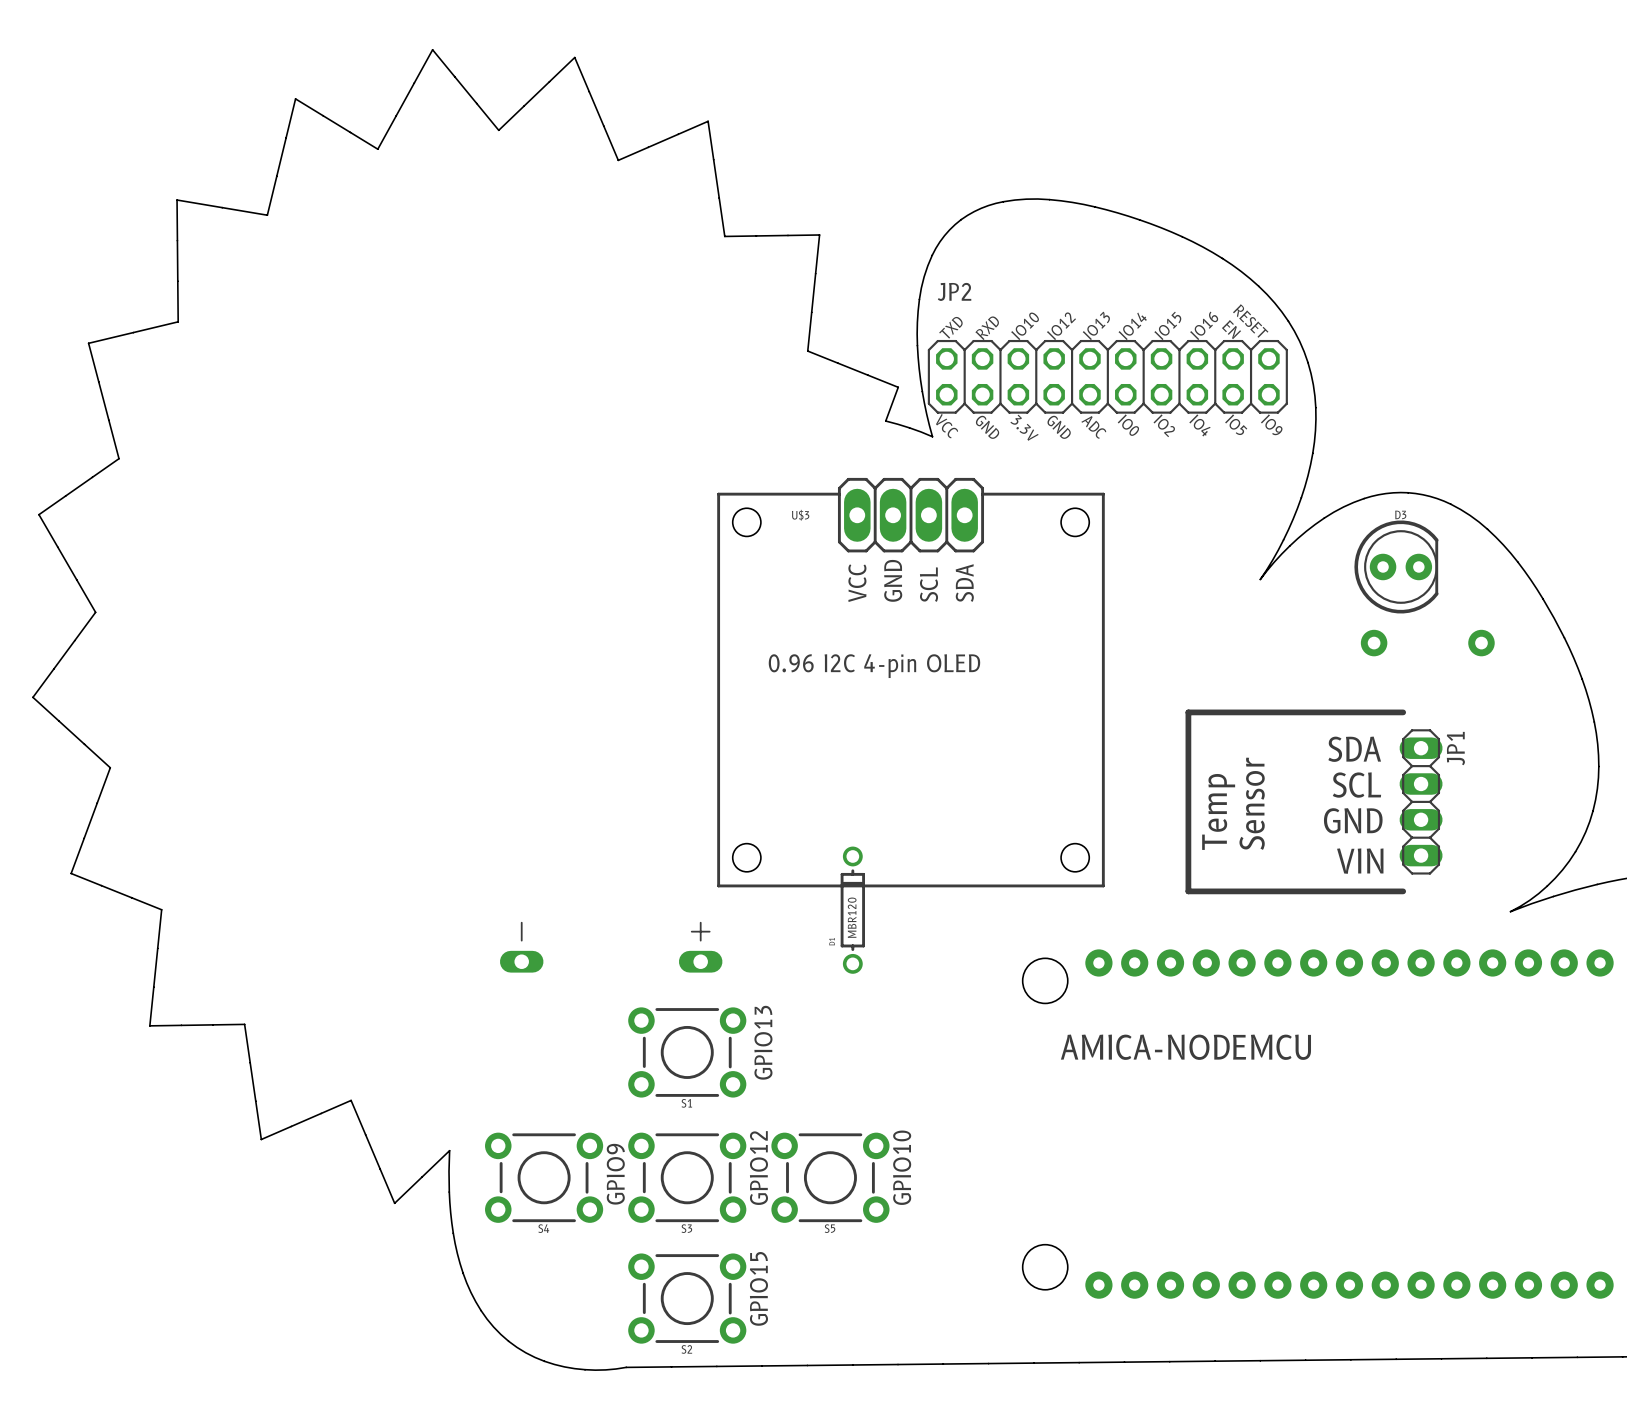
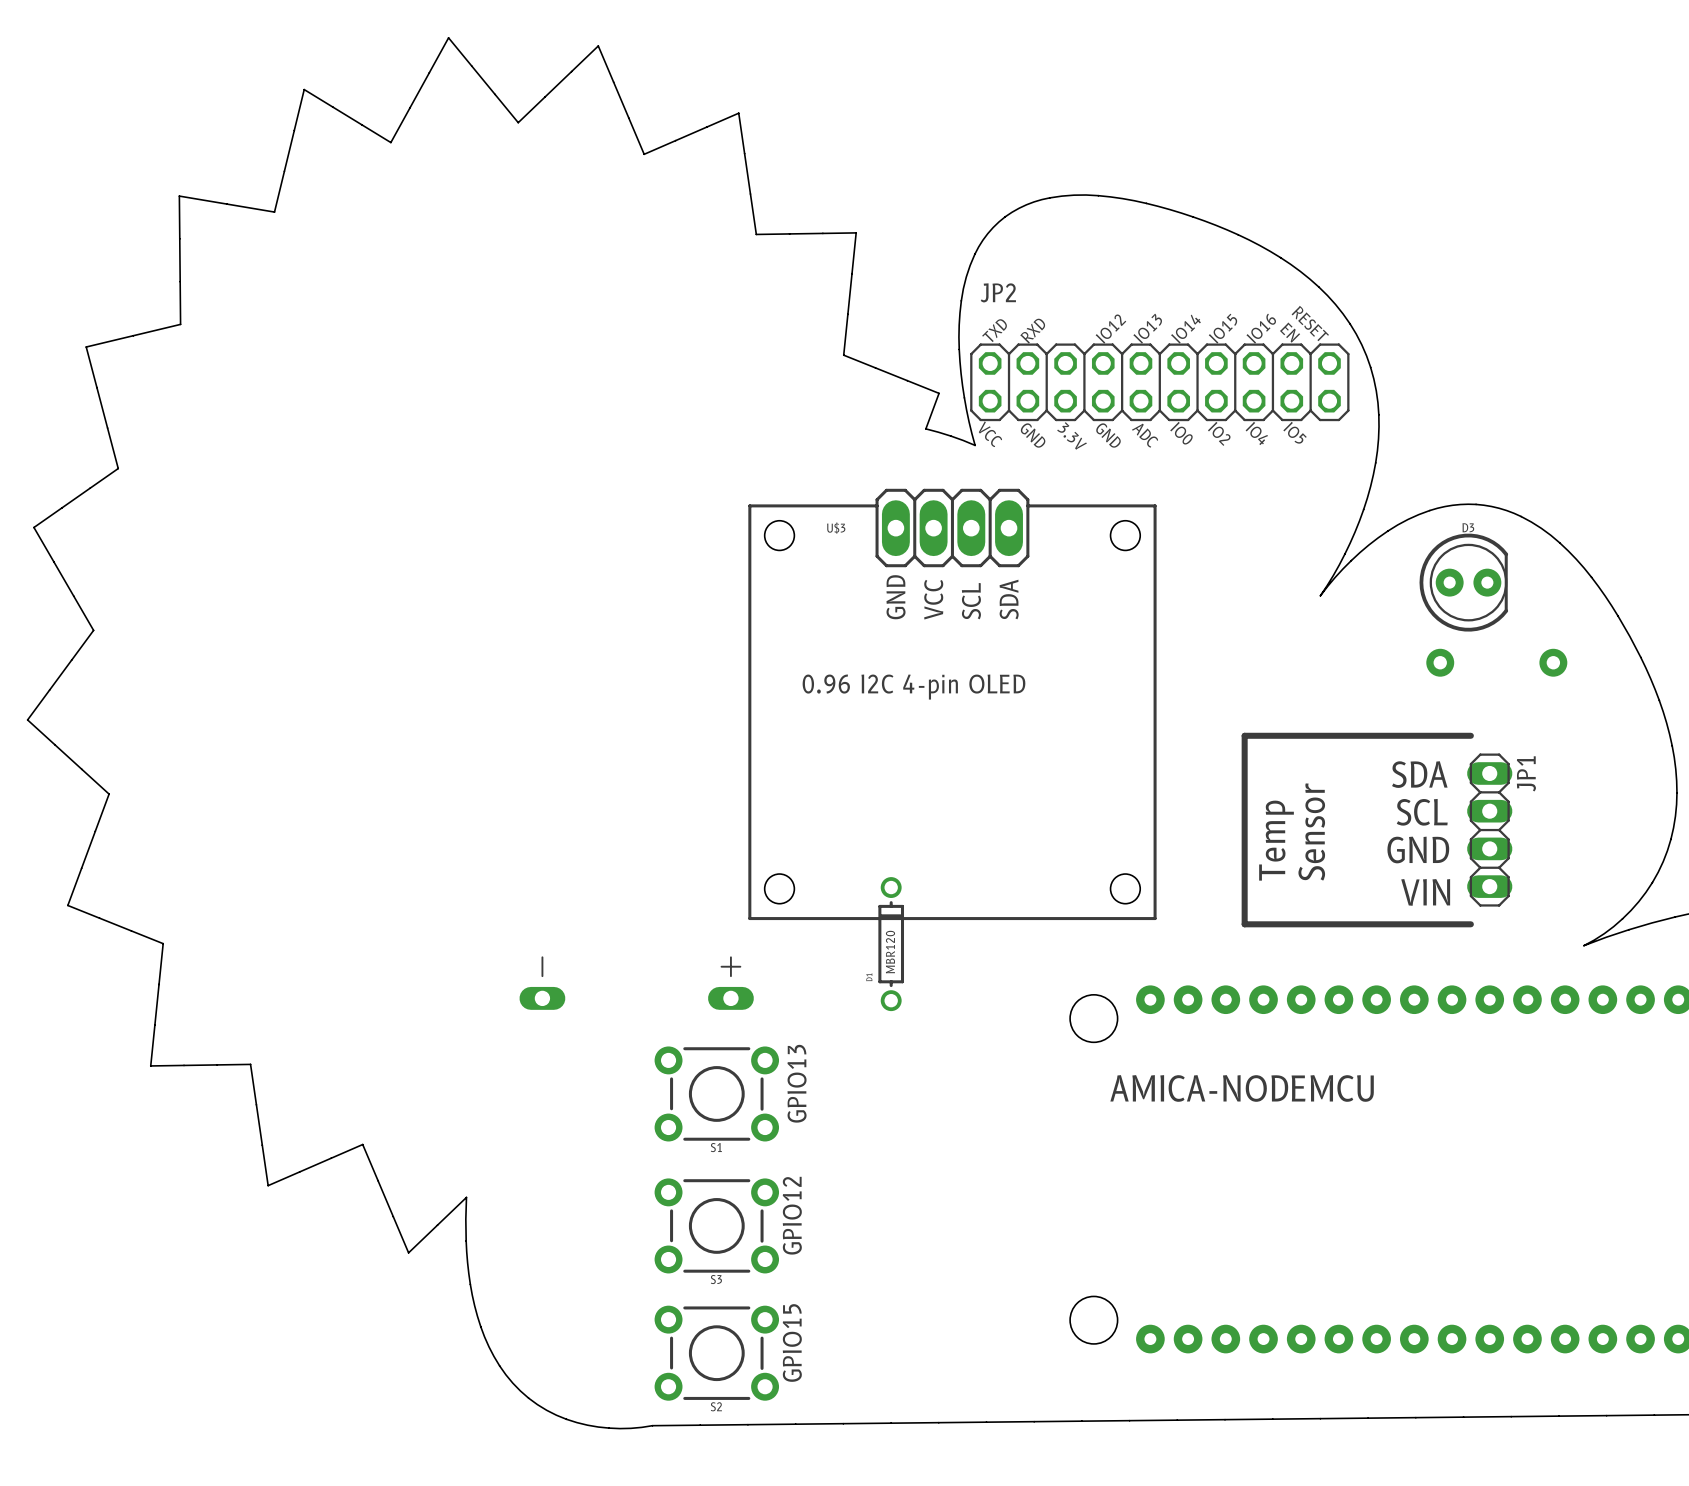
text: IO10 (1025, 326) -> none
text: IO9 (1271, 424) -> none
U$3 text: GND (893, 580) -> VCC (933, 599)
U$3 text: VCC (857, 583) -> GND (896, 597)
text: GPIO10 (902, 1167) -> none
text: GPIO9 (615, 1174) -> none
S4: (544, 1177) -> none
S5: (830, 1177) -> none

